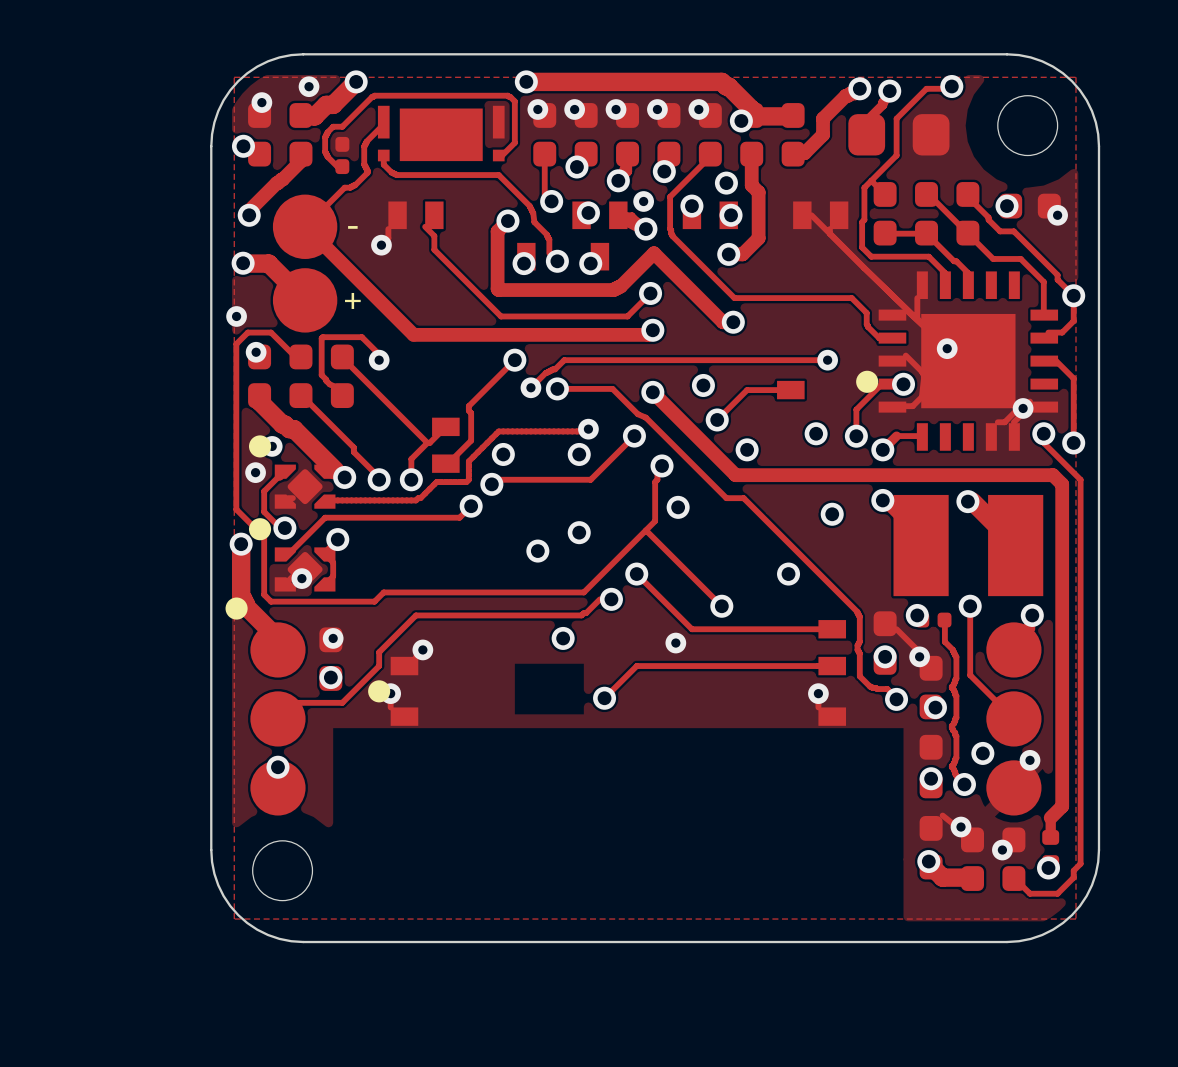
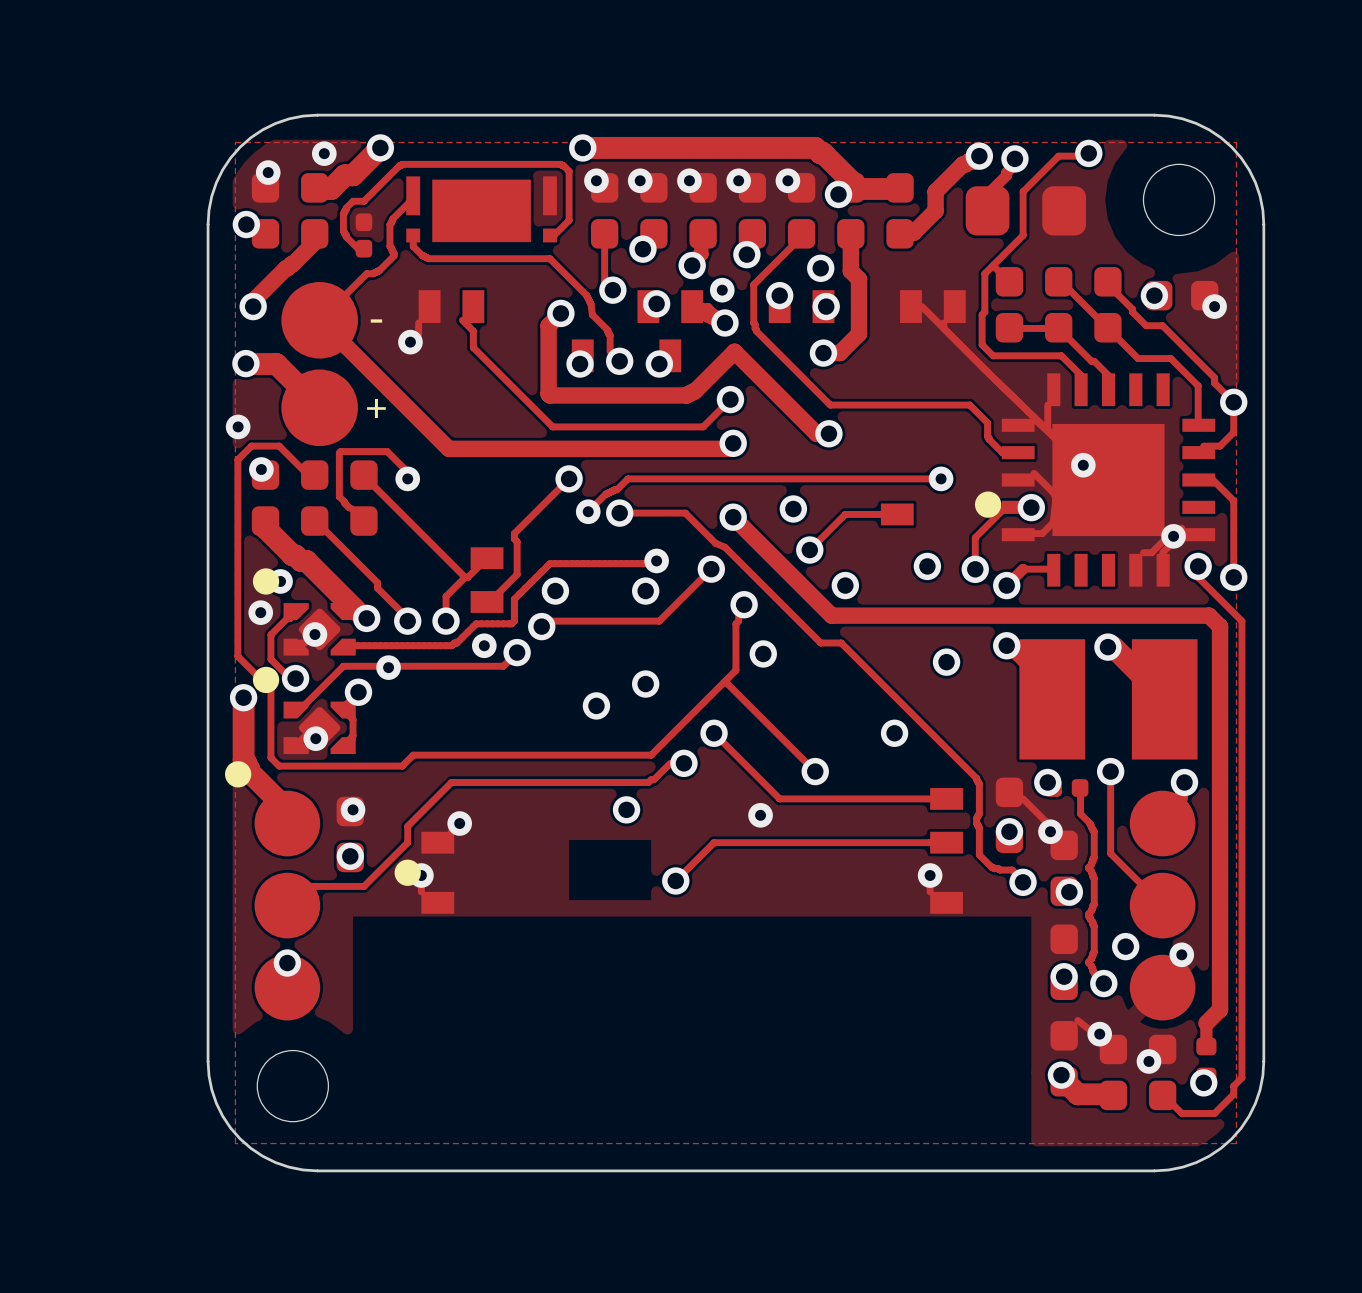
via: none -> (314, 634)
via: none -> (484, 645)
via: none -> (388, 667)

